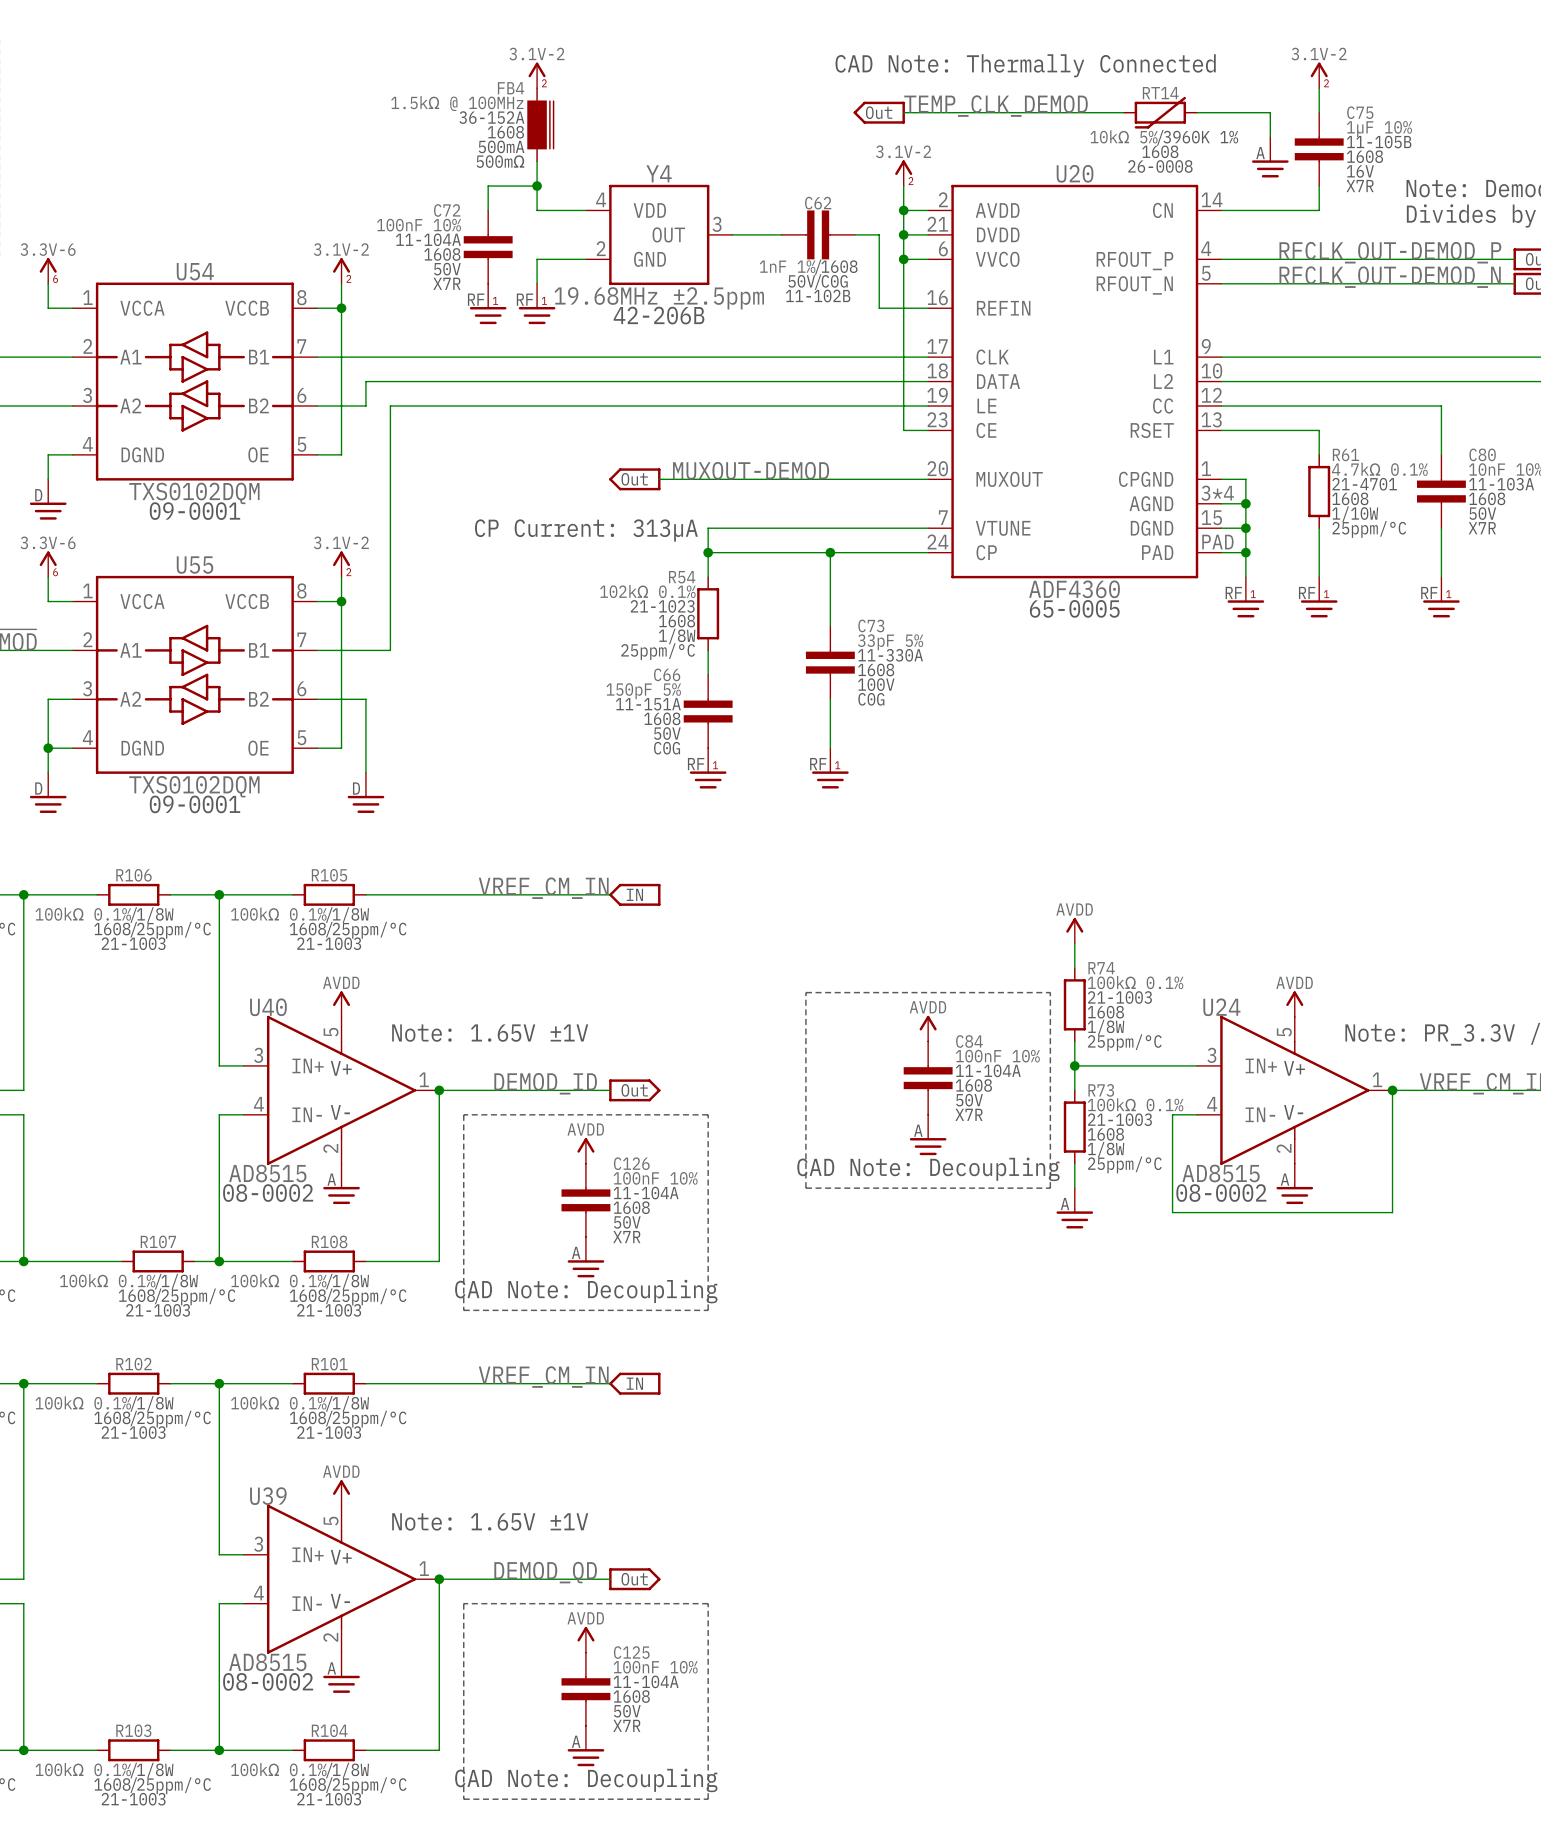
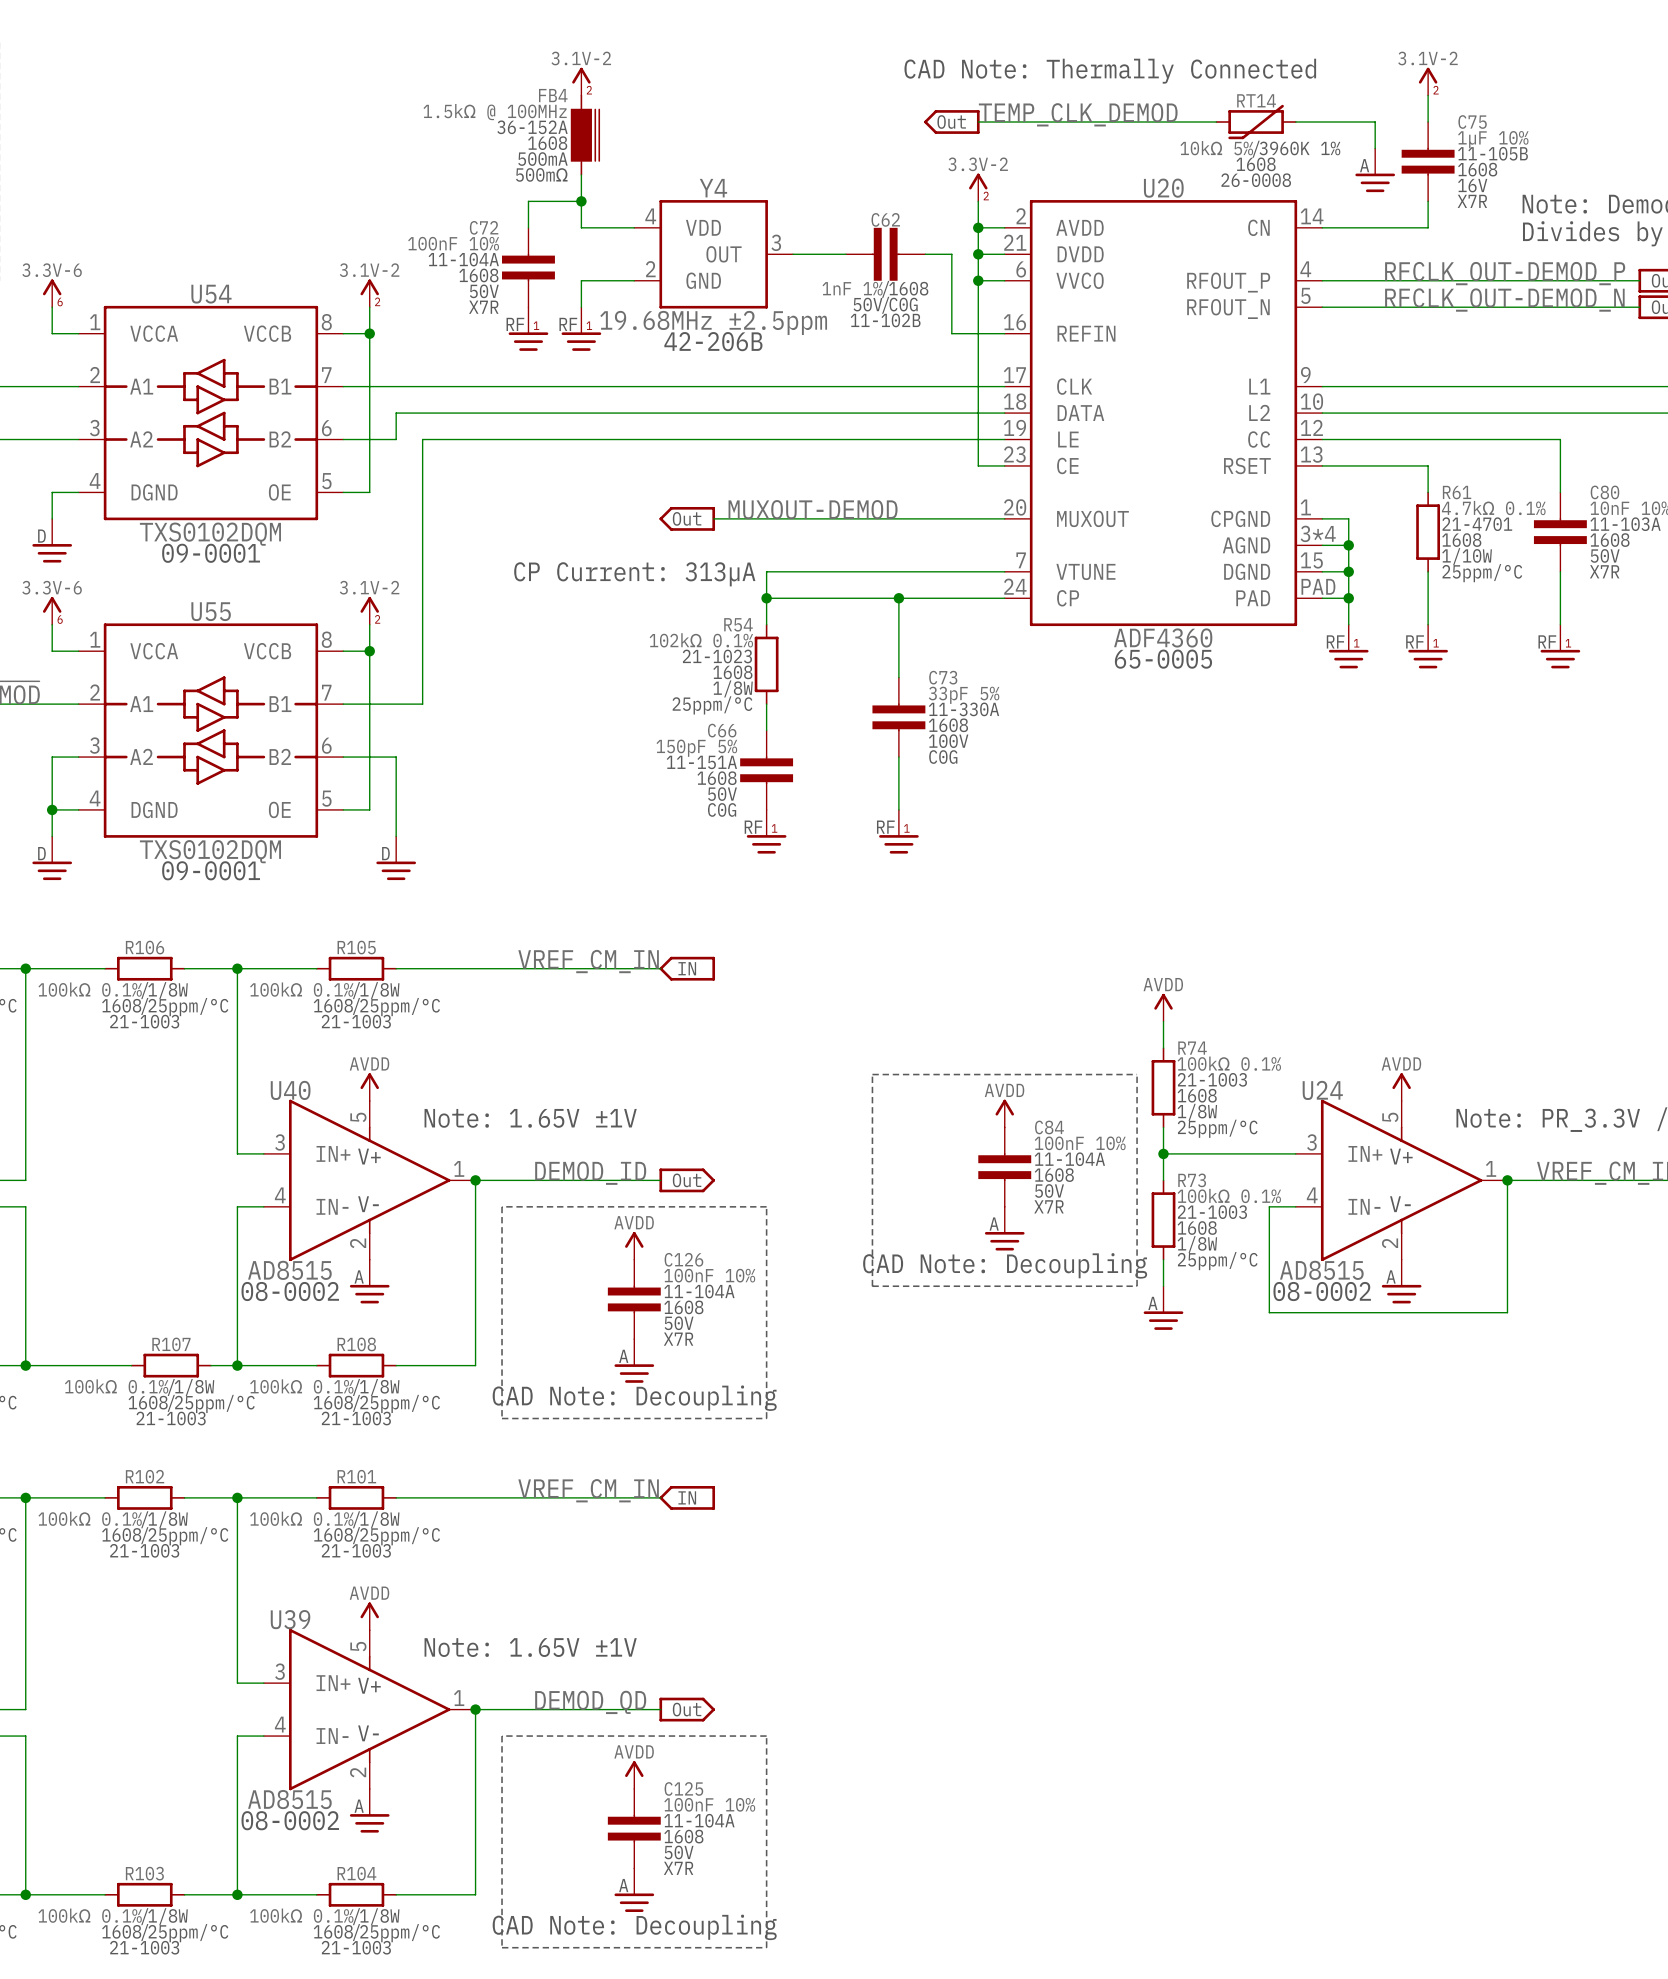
power symbol: 3.1V-2 (903, 173) -> 3.3V-2 (978, 187)

